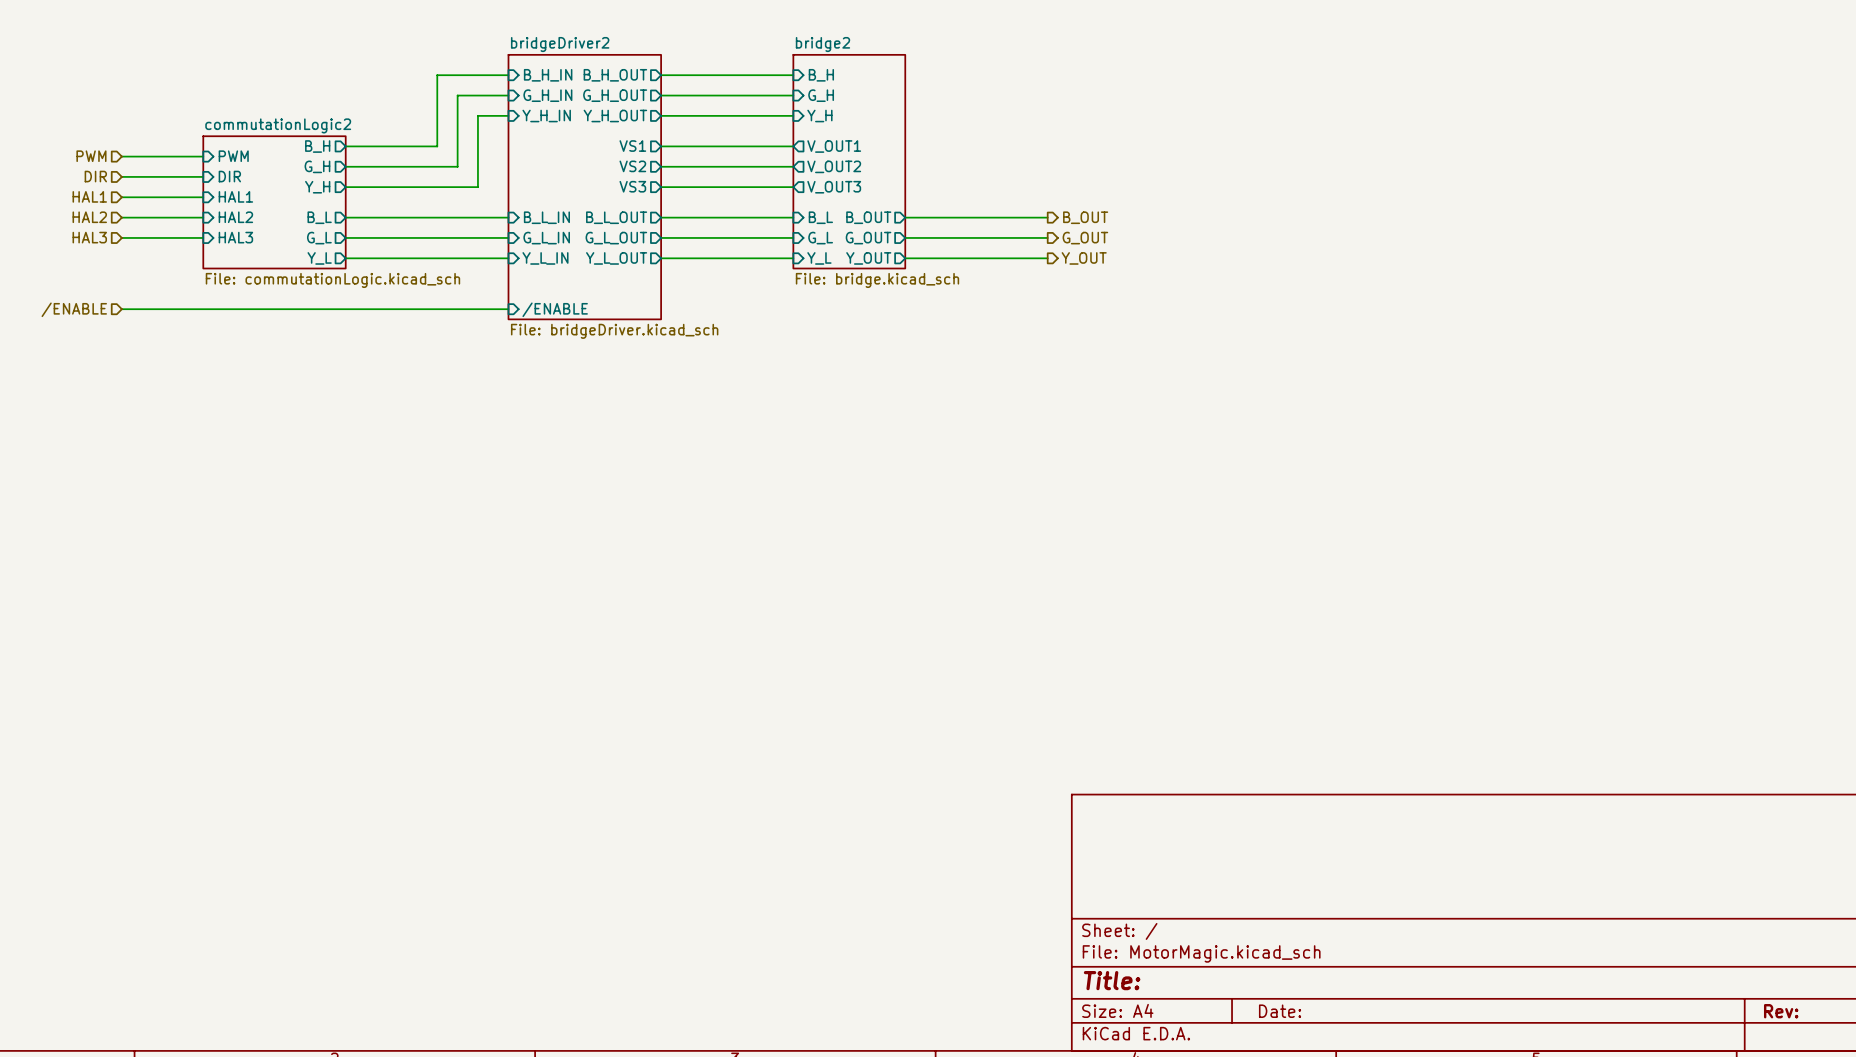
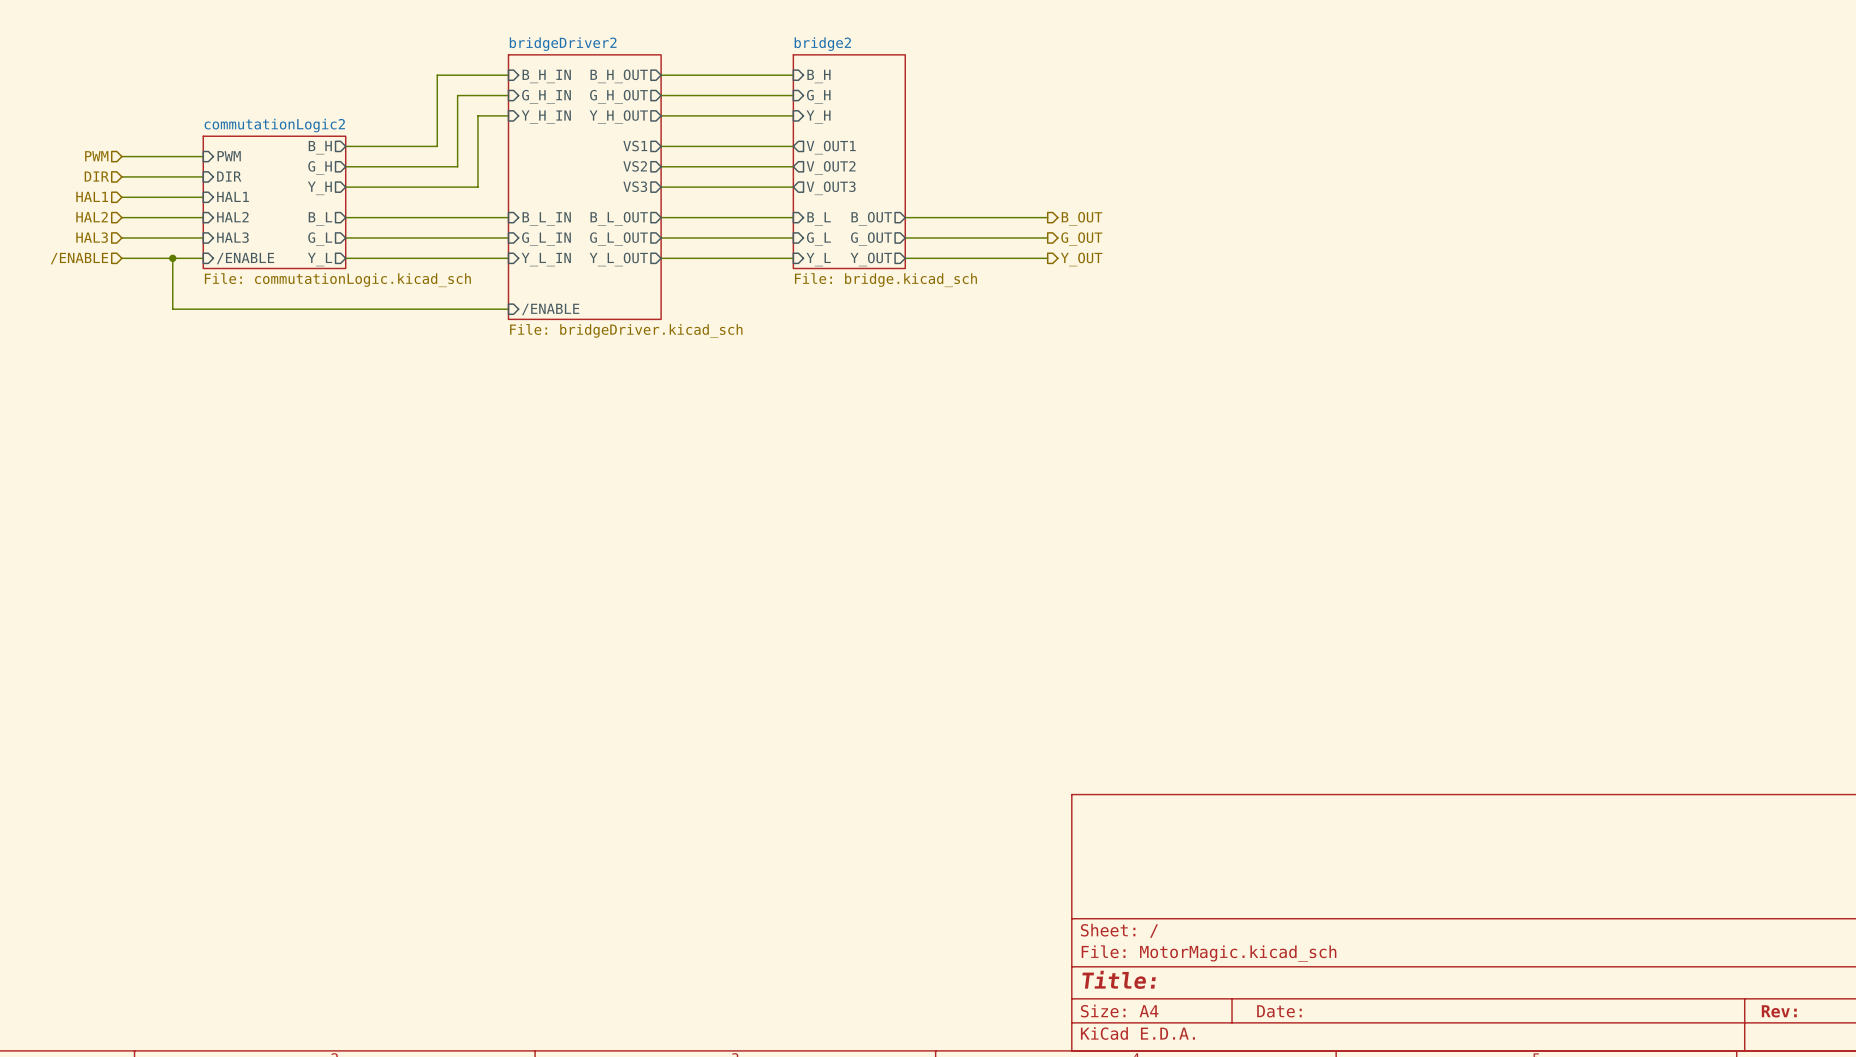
wire: none -> (121, 258) (203, 258)
junction: none -> (172, 258)
sheet pin: none -> /ENABLE (245, 258)
hierarchical label position: /ENABLE (74, 309) -> /ENABLE (79, 258)
wire: (121, 309) (172, 309) -> (172, 258) (172, 309)

